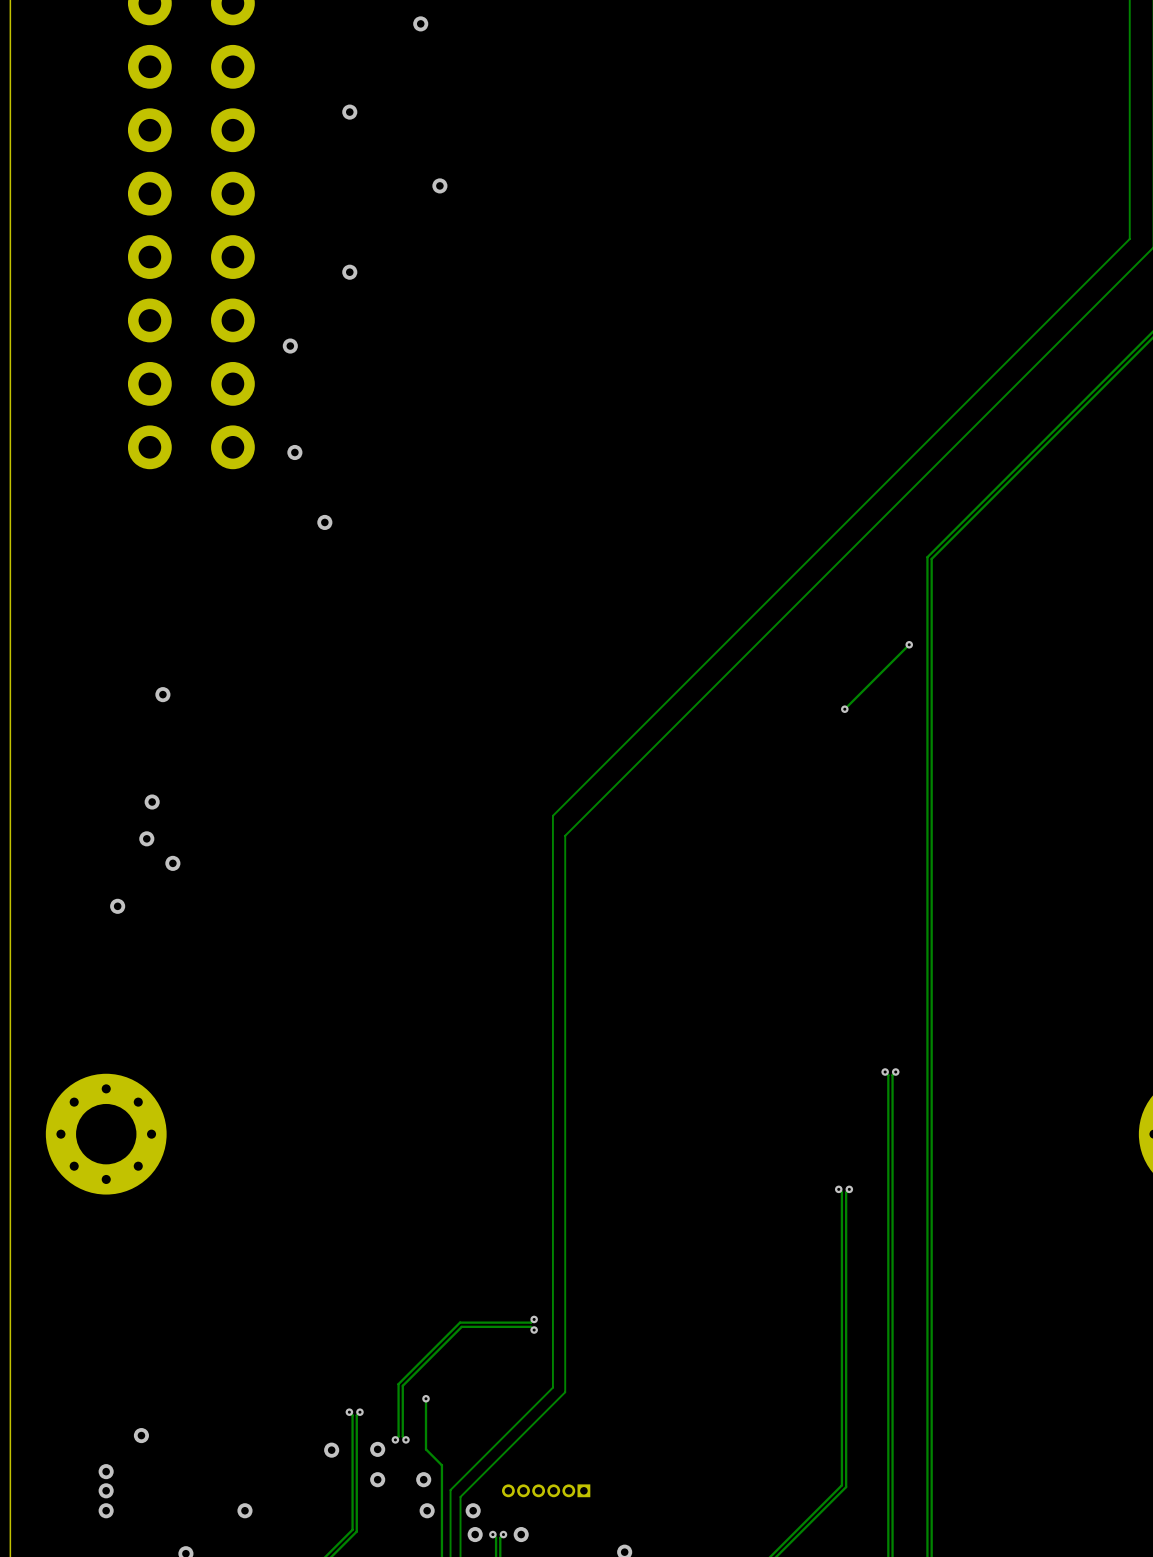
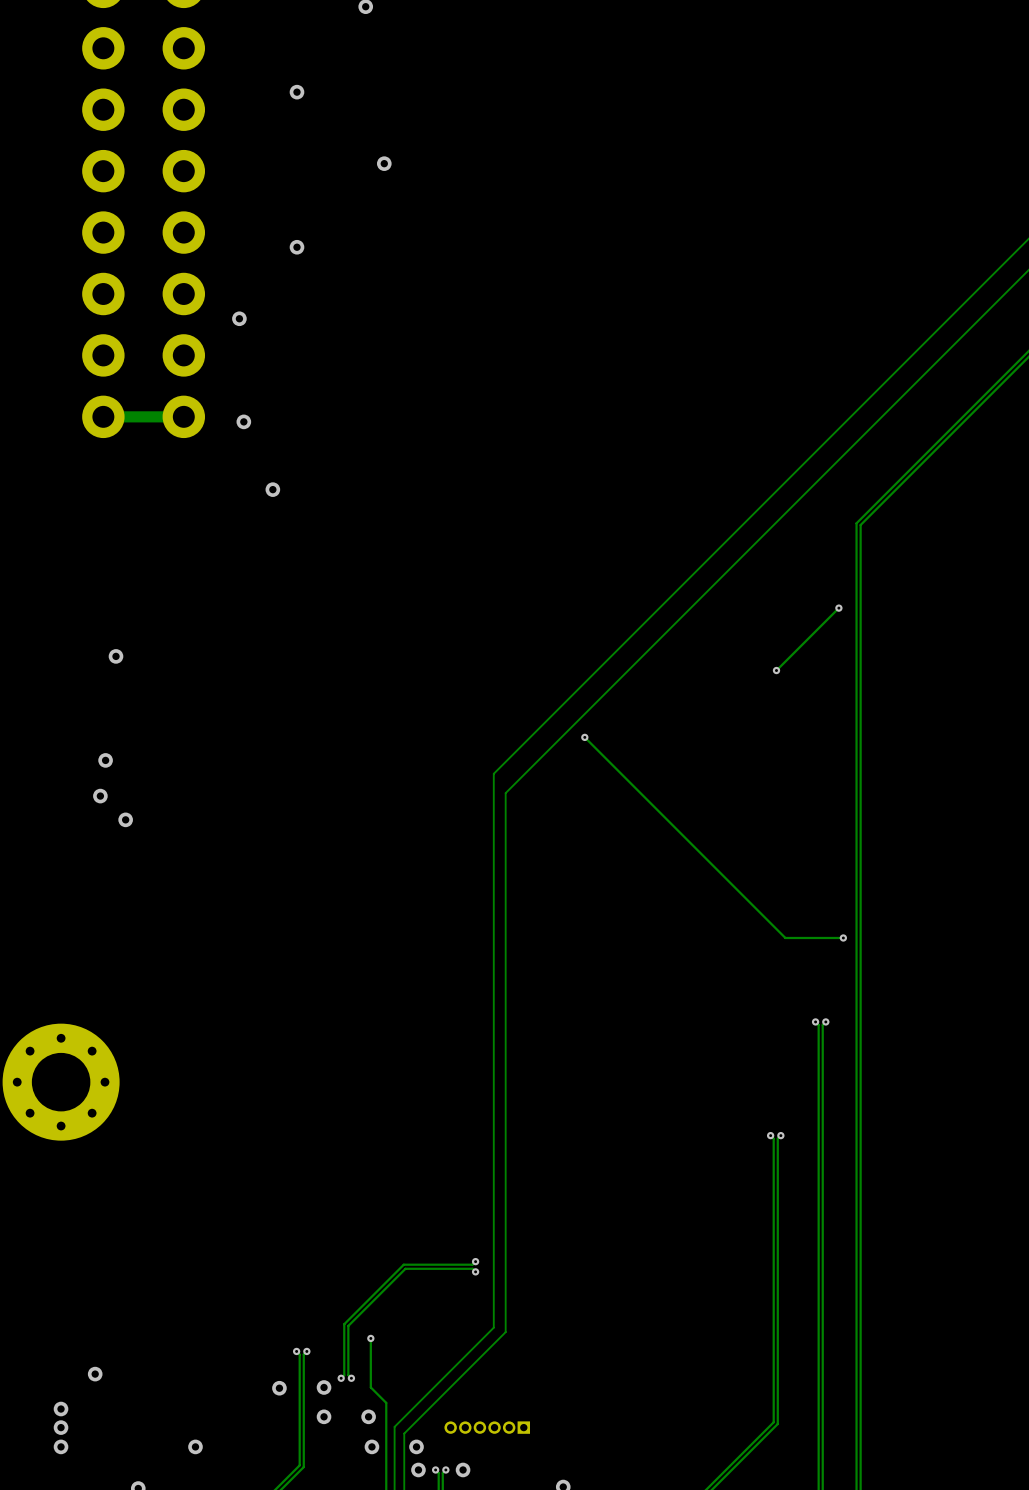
track: none -> (183, 416) (103, 416)
track: none -> (584, 737) (785, 937) (843, 937)
via: none -> (584, 737)
via: (117, 906) -> none
via: none -> (843, 937)

